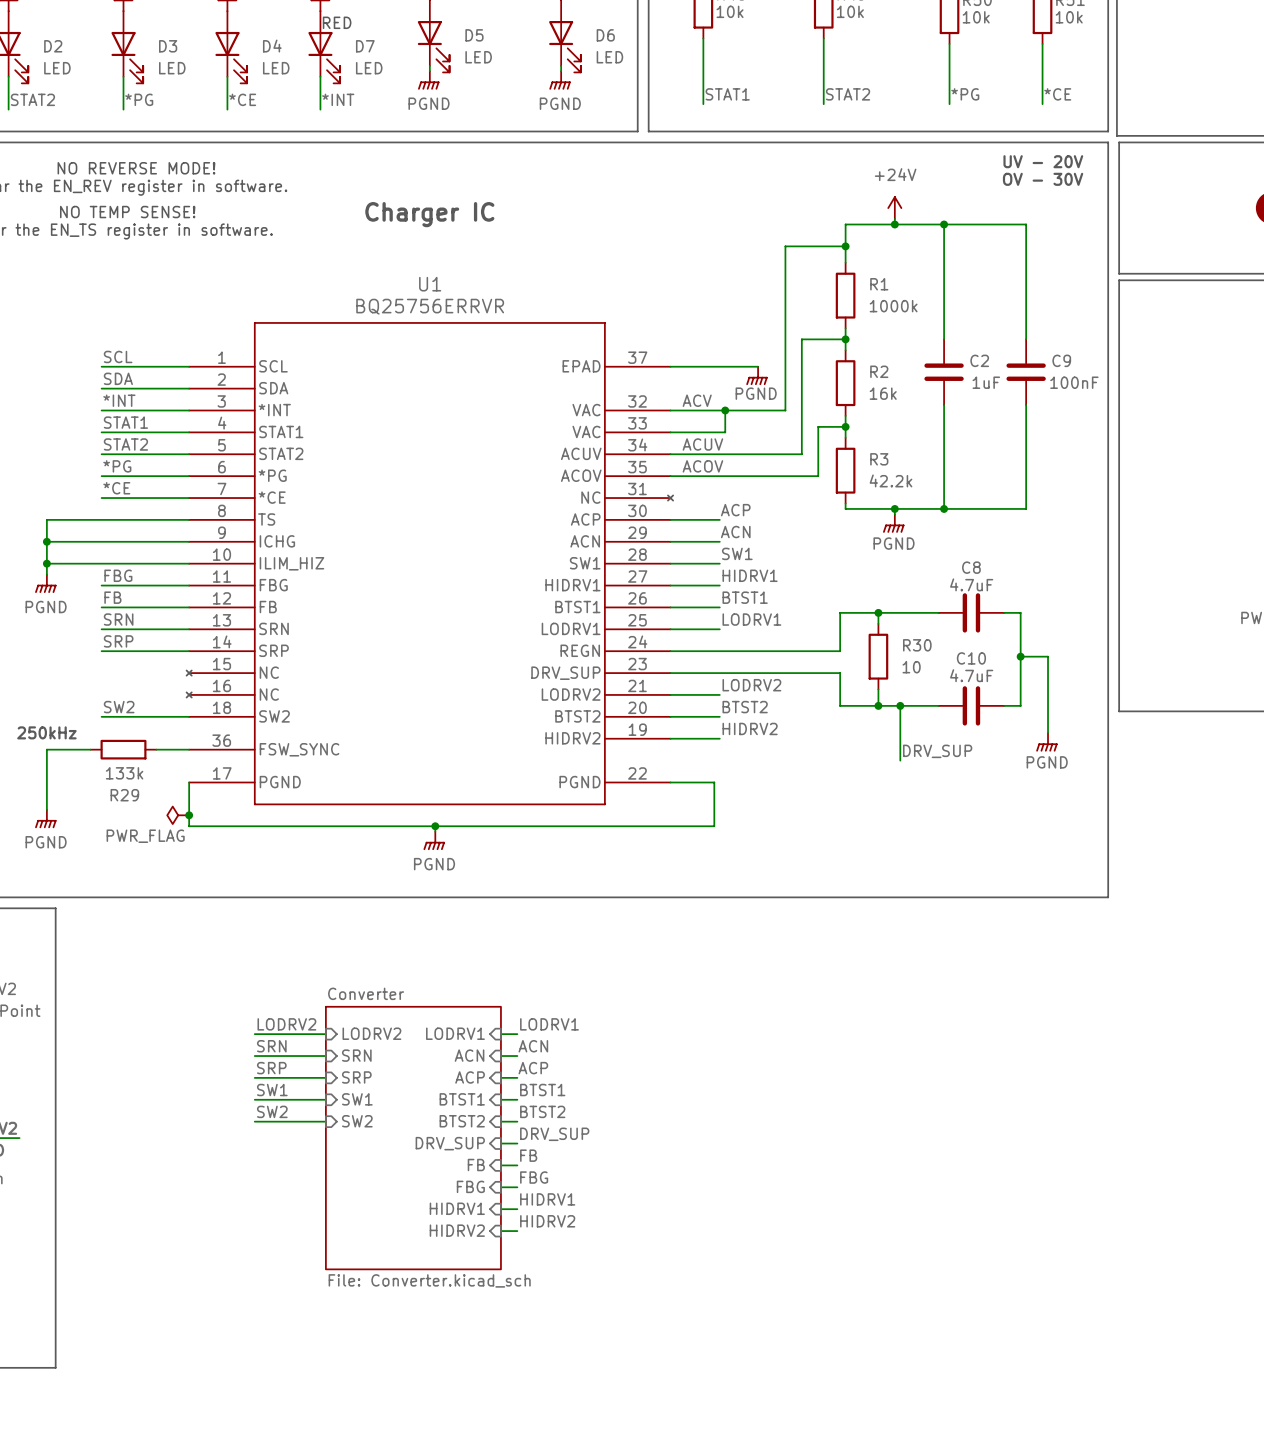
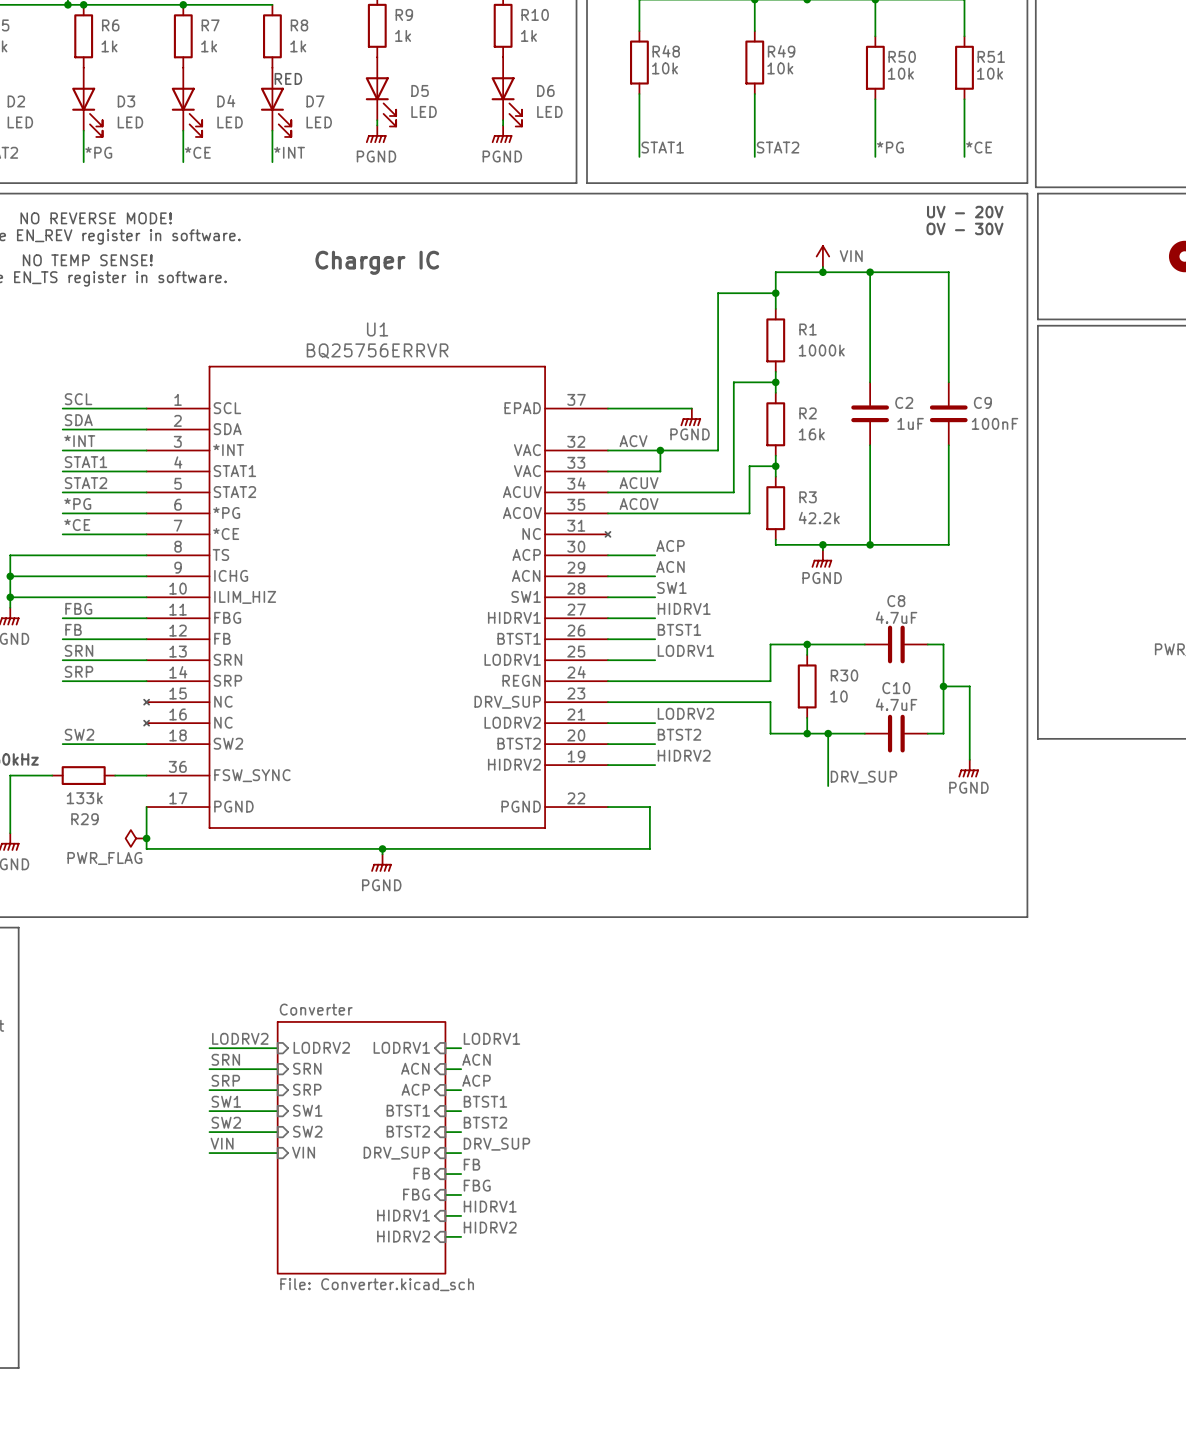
power symbol: +24V (894, 208) -> VIN (822, 256)
label: none -> VIN (222, 1143)
wire: none -> (209, 1153) (277, 1153)
sheet pin: none -> VIN (303, 1152)

